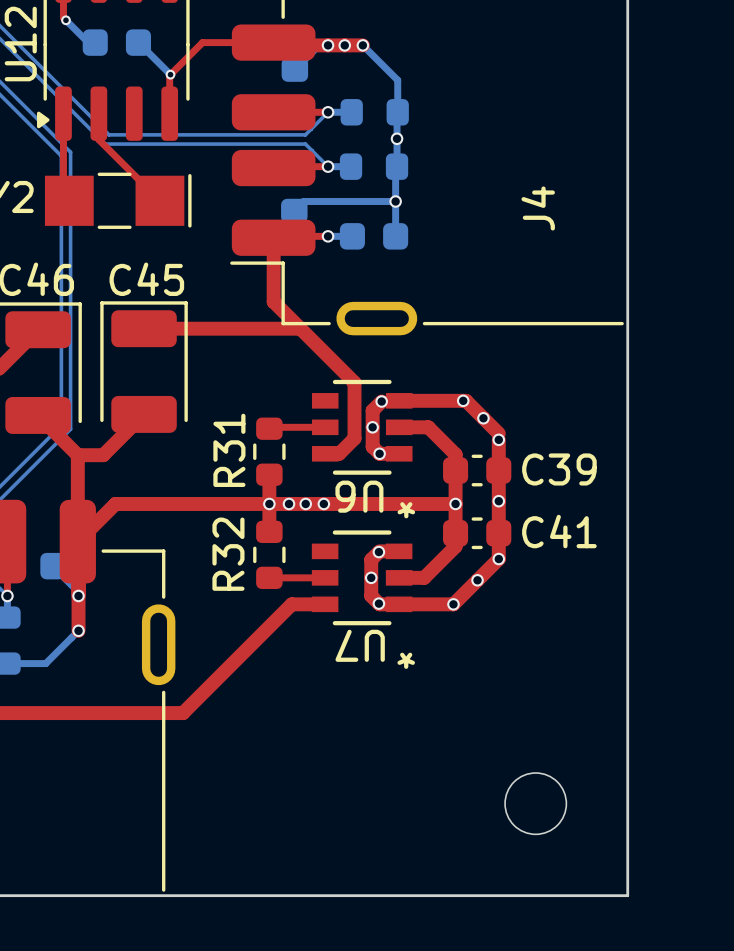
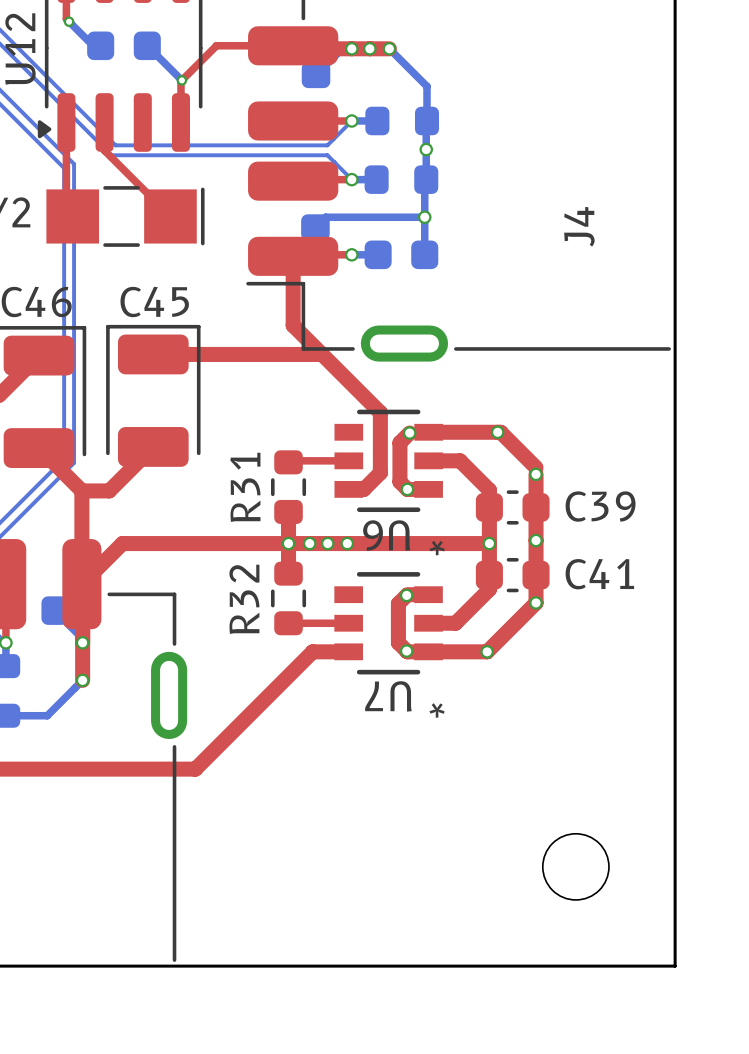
via: (483, 418) -> none
via: (372, 427) -> none
via: (371, 577) -> none
via: (477, 580) -> none

